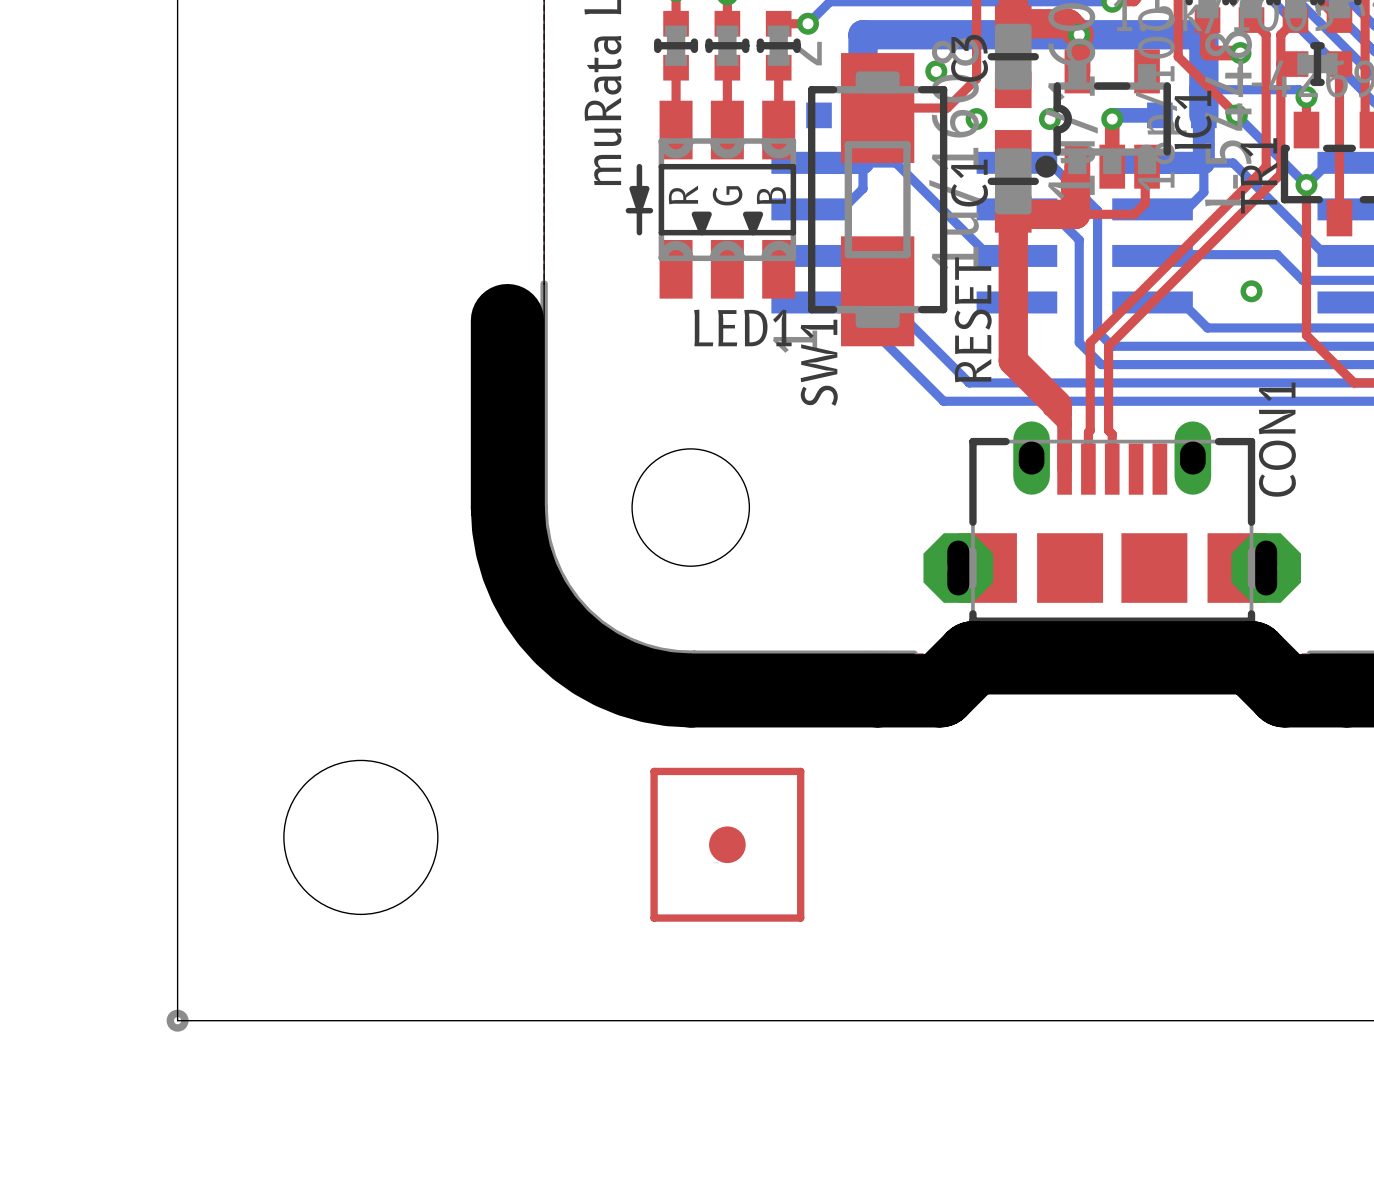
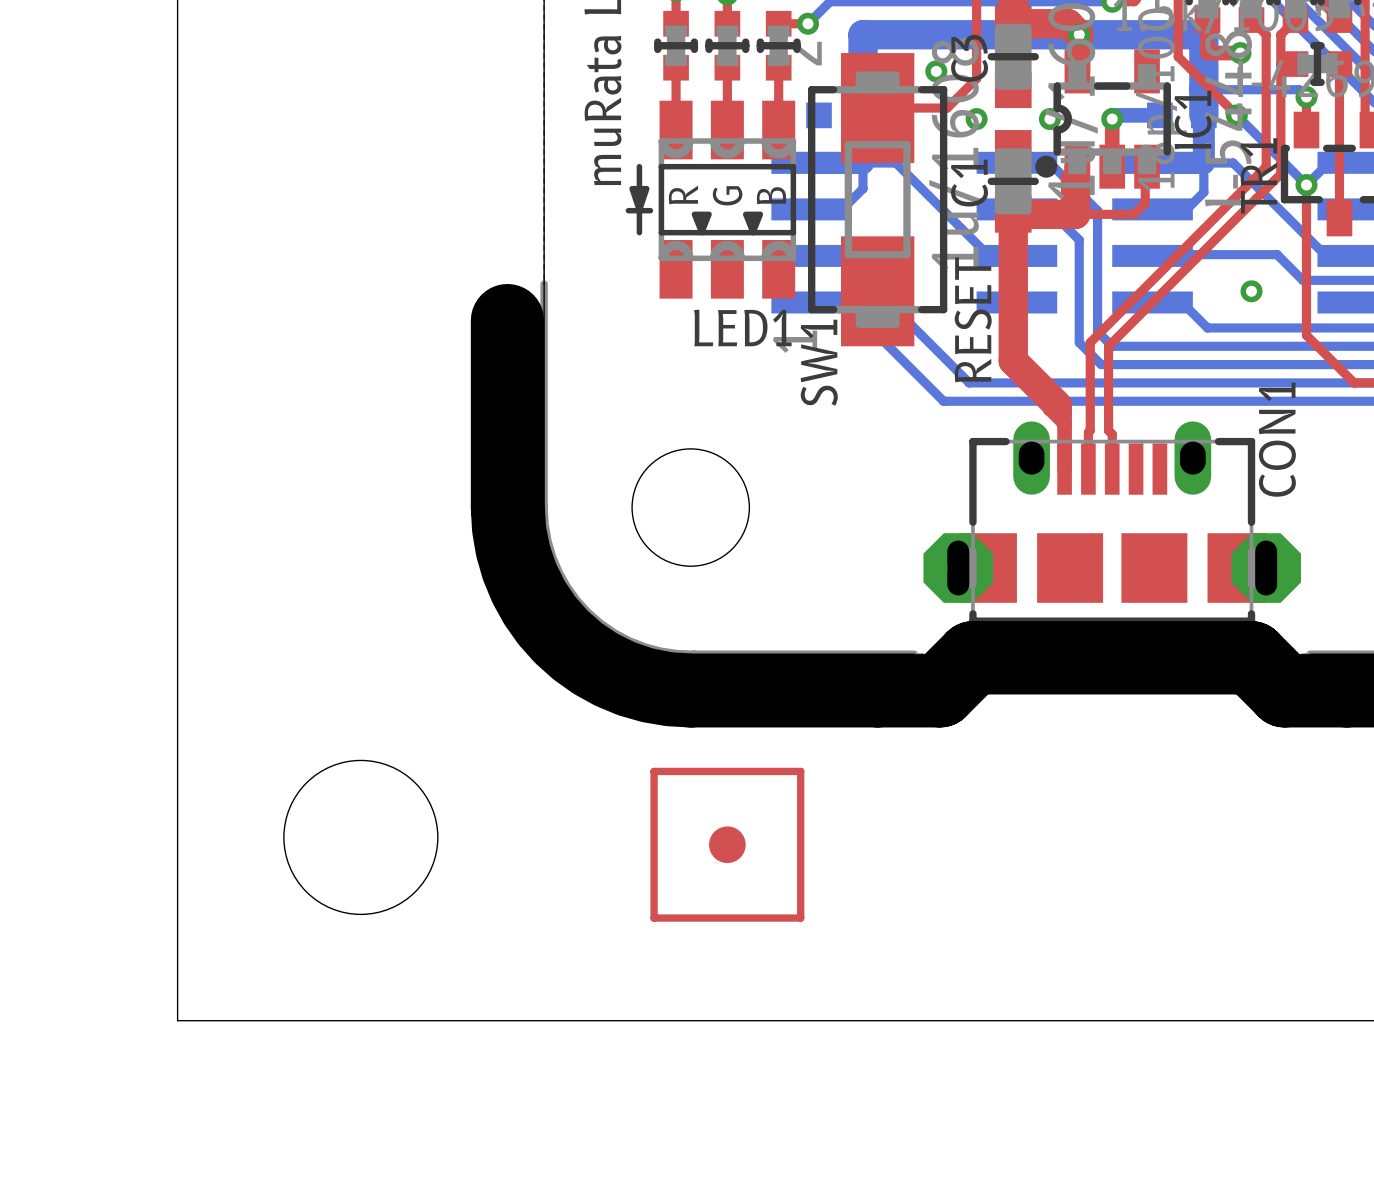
drawing: [166, 1009, 189, 1032] -> none

